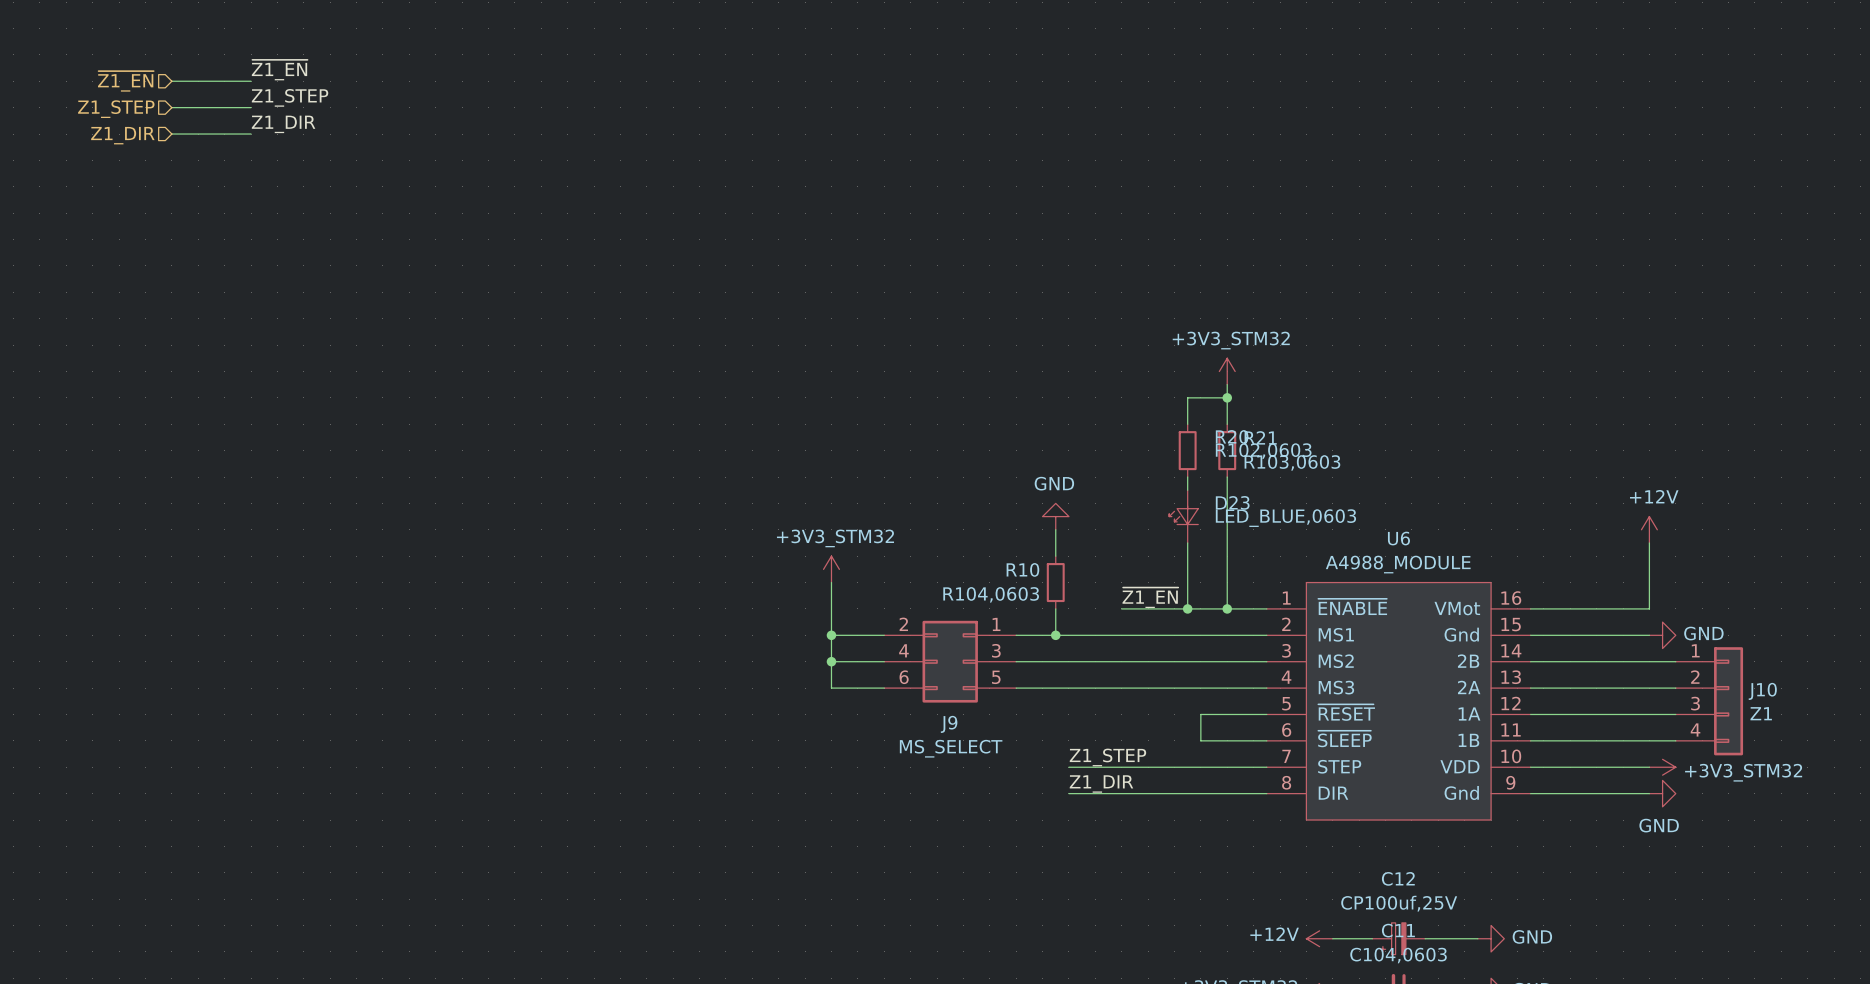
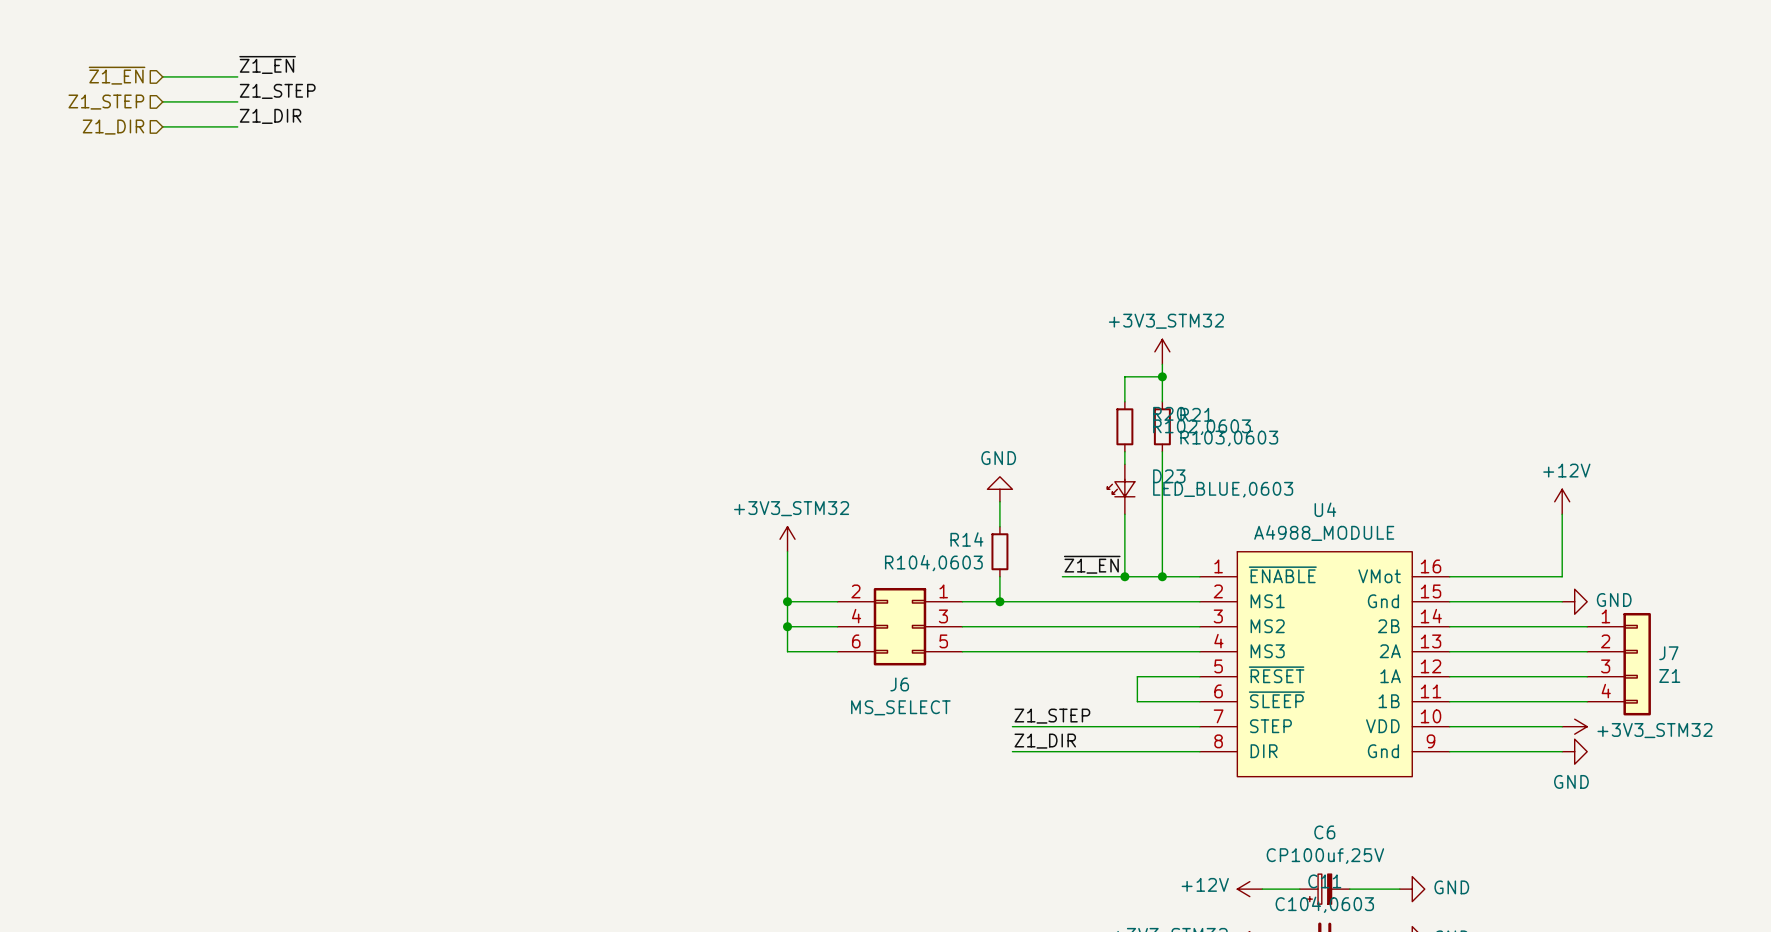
U6 name: U6 (1398, 538) -> U4 (1325, 509)
R10 name: R10 (1022, 569) -> R14 (966, 539)
J10 name: J10 (1762, 691) -> J7 (1668, 653)
J9 name: J9 (949, 724) -> J6 (899, 684)
C12 name: C12 (1398, 878) -> C6 (1324, 832)

